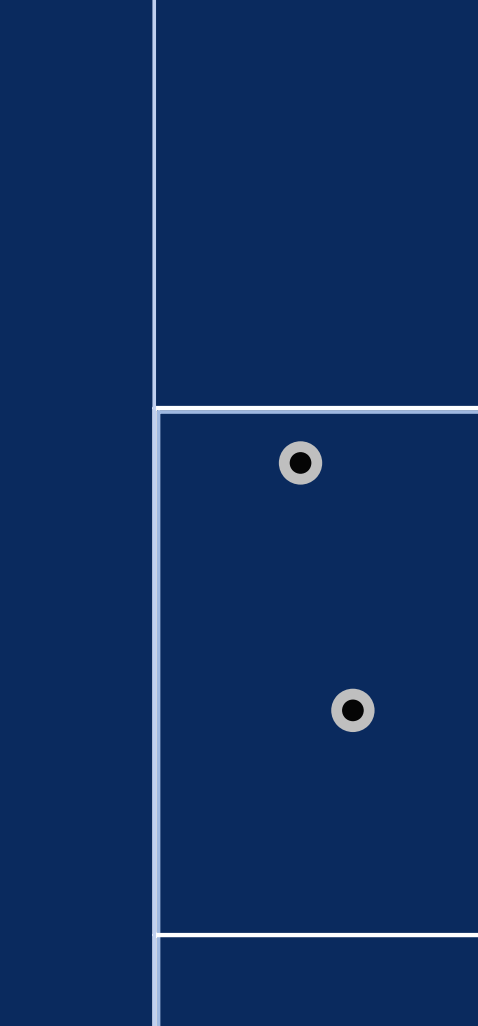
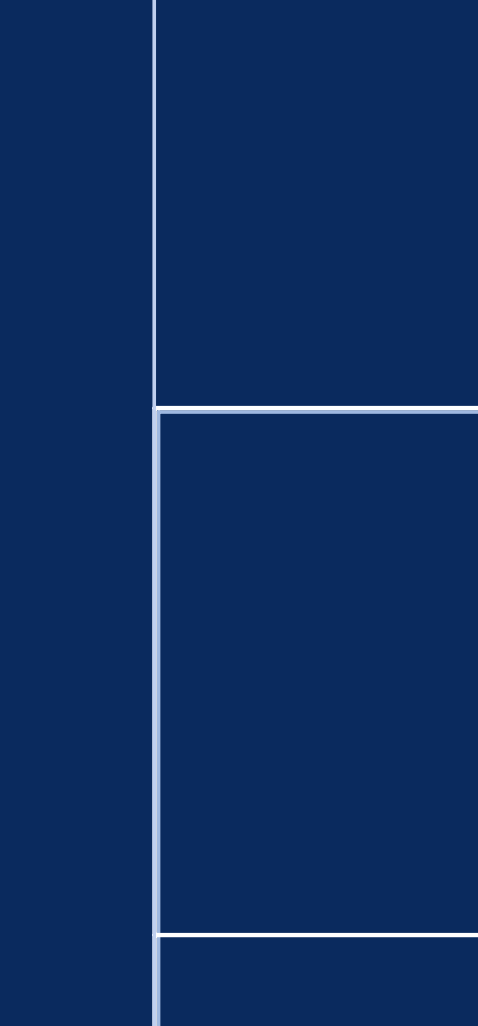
via: (300, 462) -> none
via: (352, 710) -> none

